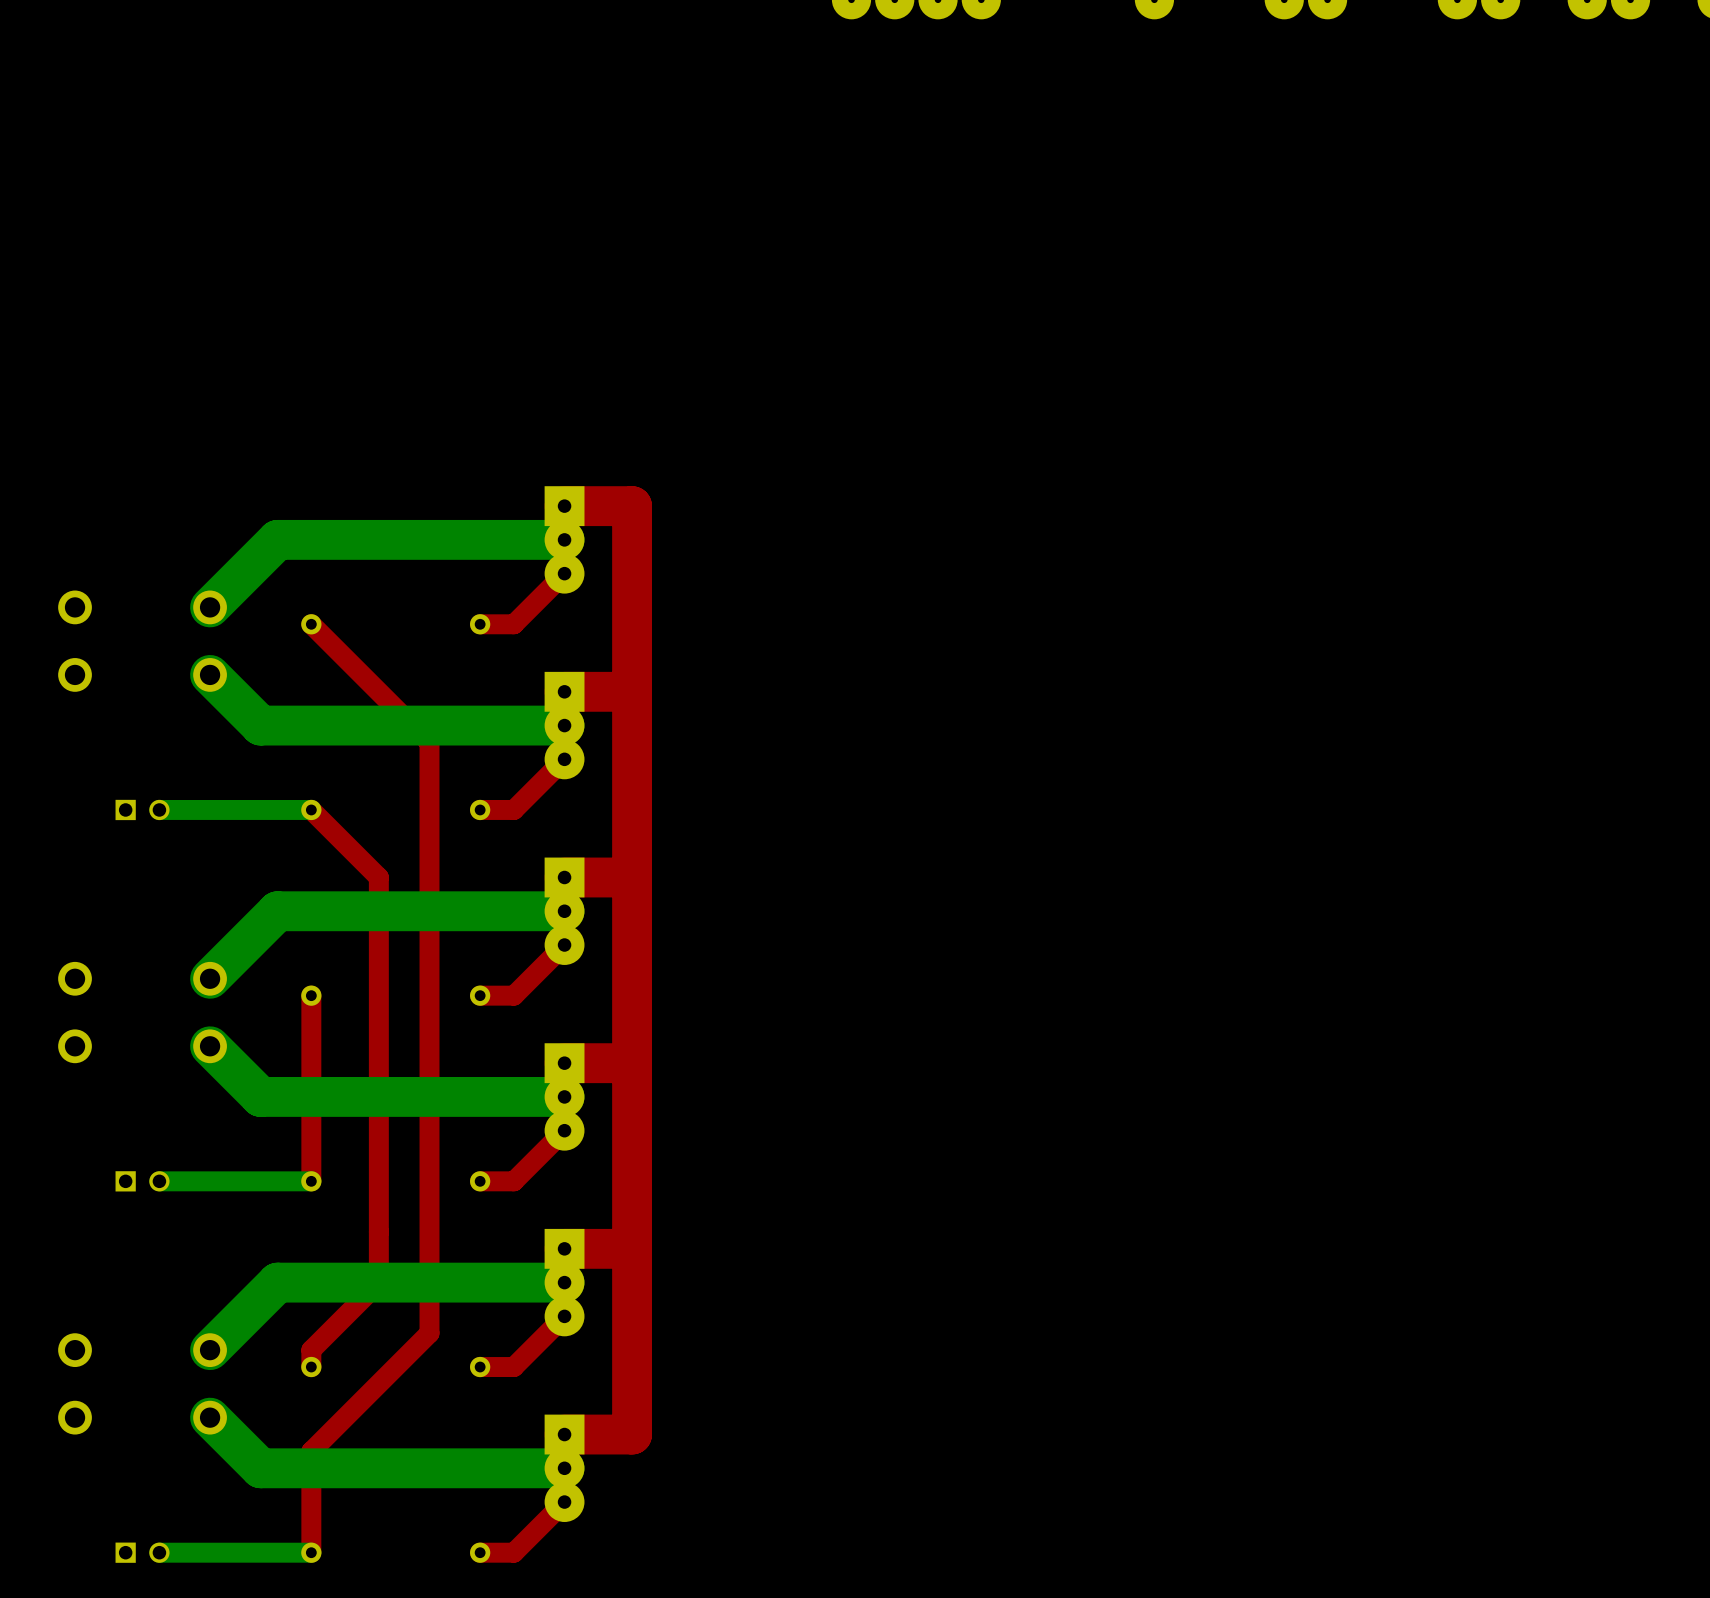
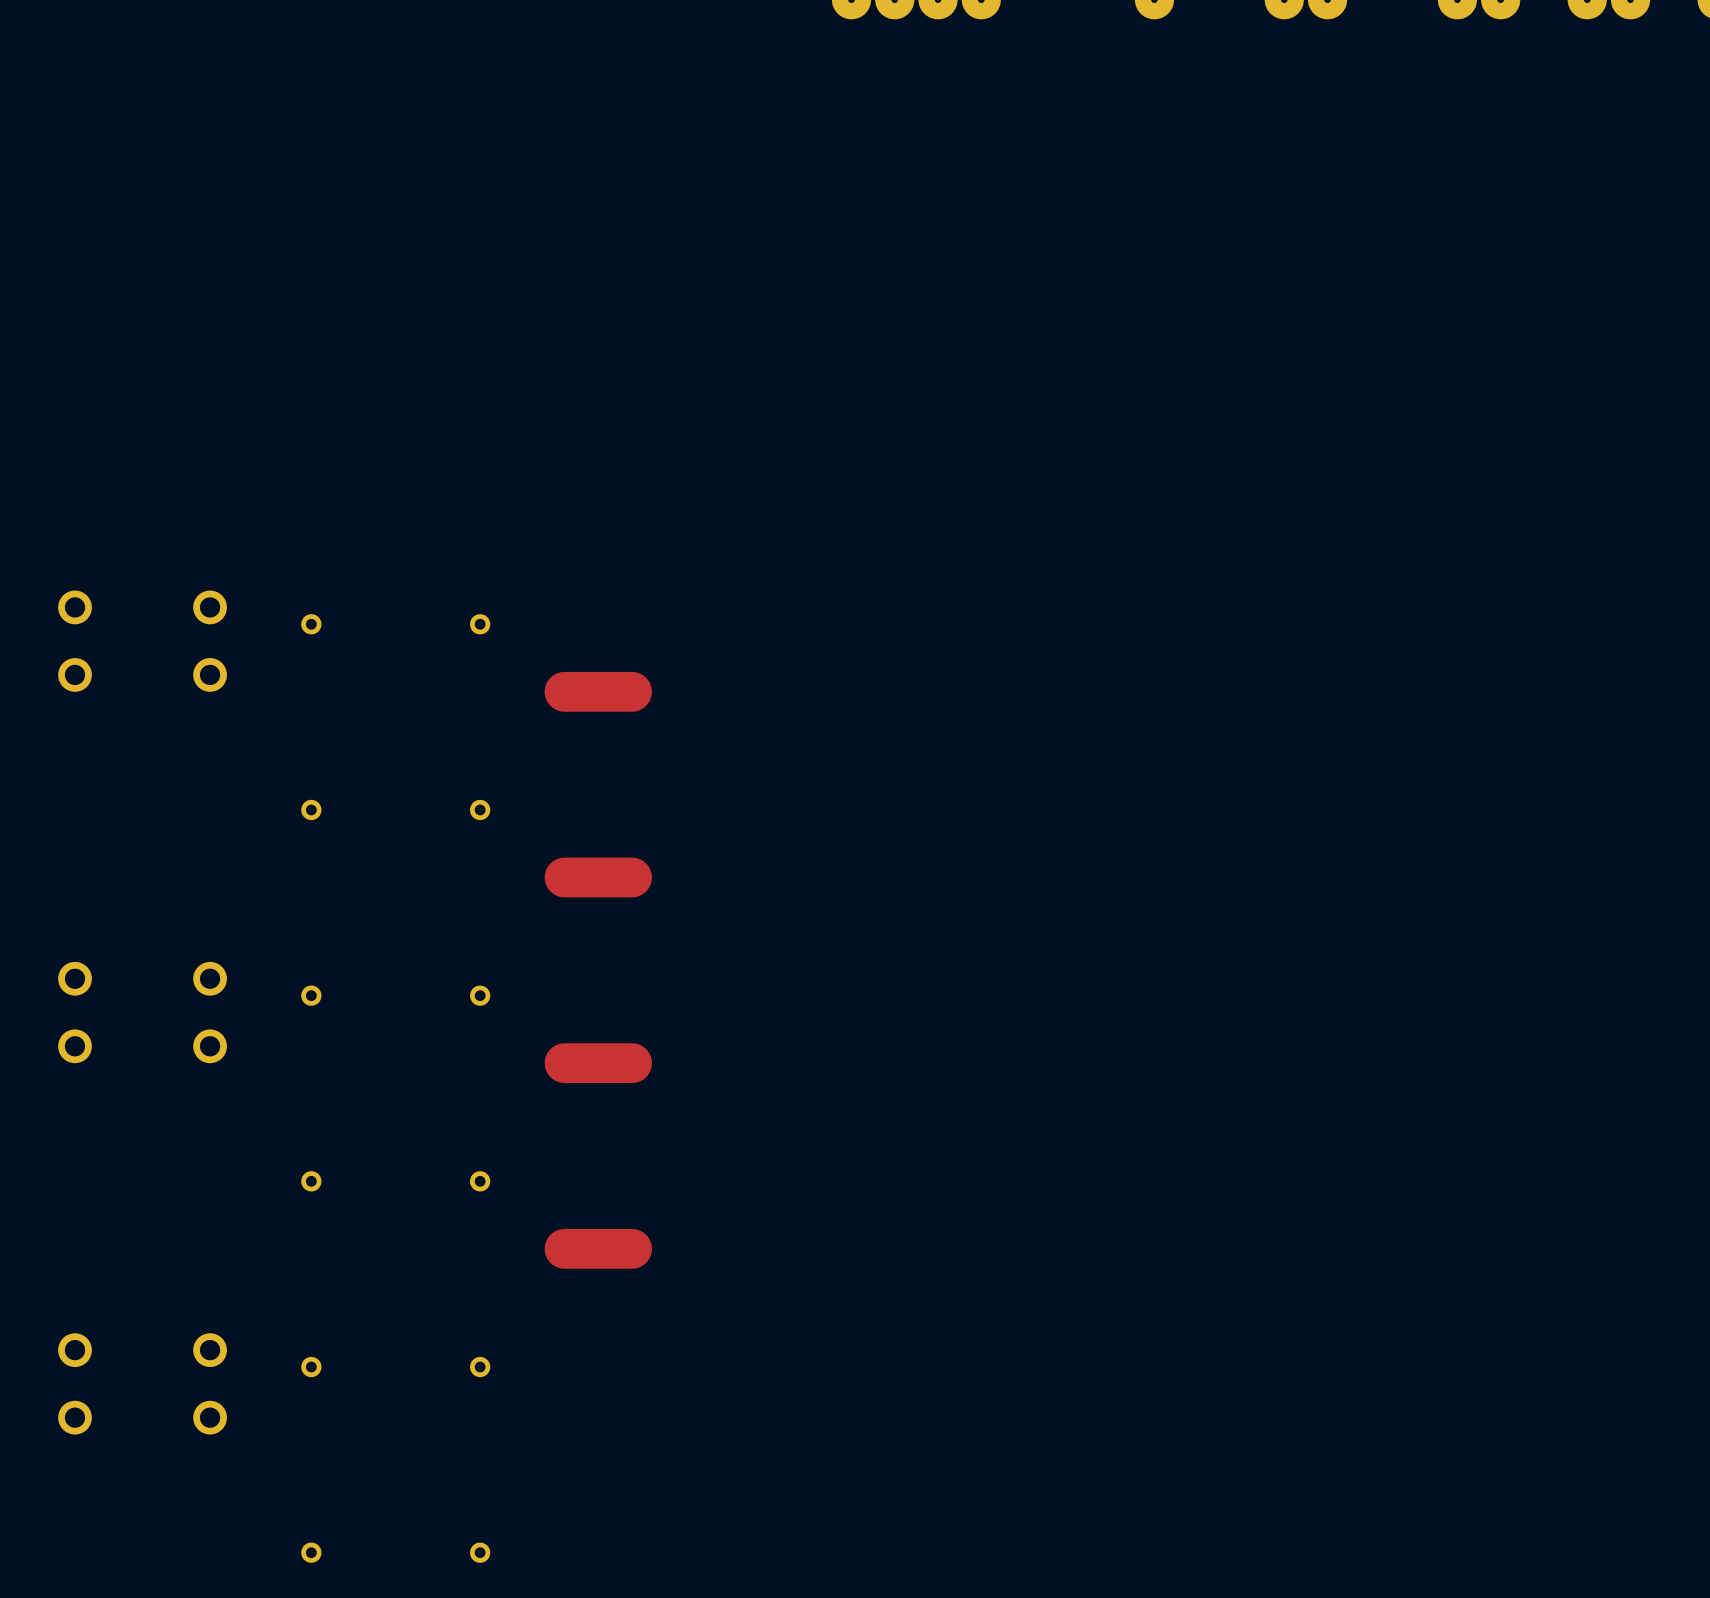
top track: (564, 506) (632, 506) (632, 1434) (564, 1434) -> none
bottom track: (564, 539) (277, 539) (210, 607) -> none
part: (564, 539) -> none
top track: (564, 573) (513, 624) (480, 624) -> none
top track: (311, 624) (429, 742) (429, 1333) (311, 1451) (311, 1552) -> none
bottom track: (210, 674) (260, 725) (564, 725) -> none
part: (564, 725) -> none
top track: (564, 759) (513, 809) (480, 809) -> none
part: (142, 809) -> none
top track: (311, 809) (378, 877) (378, 1282) (311, 1350) (311, 1367) -> none
bottom track: (311, 809) (159, 809) -> none
bottom track: (564, 911) (277, 911) (210, 978) -> none
part: (564, 911) -> none
top track: (564, 945) (513, 995) (480, 995) -> none
top track: (311, 995) (311, 1181) -> none
bottom track: (210, 1046) (260, 1096) (564, 1096) -> none
part: (564, 1096) -> none
top track: (564, 1130) (513, 1181) (480, 1181) -> none
part: (142, 1181) -> none
bottom track: (311, 1181) (159, 1181) -> none
bottom track: (564, 1282) (277, 1282) (210, 1350) -> none
part: (564, 1282) -> none
top track: (564, 1316) (513, 1367) (480, 1367) -> none
bottom track: (210, 1417) (260, 1468) (564, 1468) -> none
part: (564, 1468) -> none
top track: (564, 1502) (513, 1552) (480, 1552) -> none
part: (142, 1552) -> none
bottom track: (311, 1552) (159, 1552) -> none

